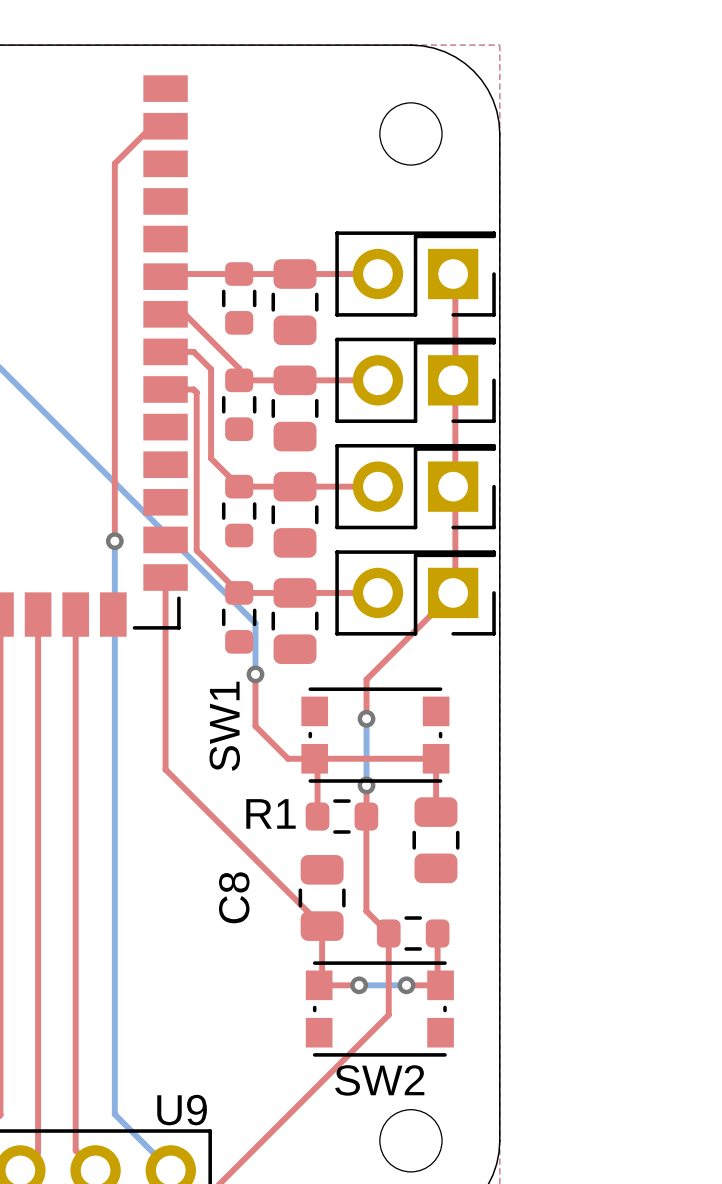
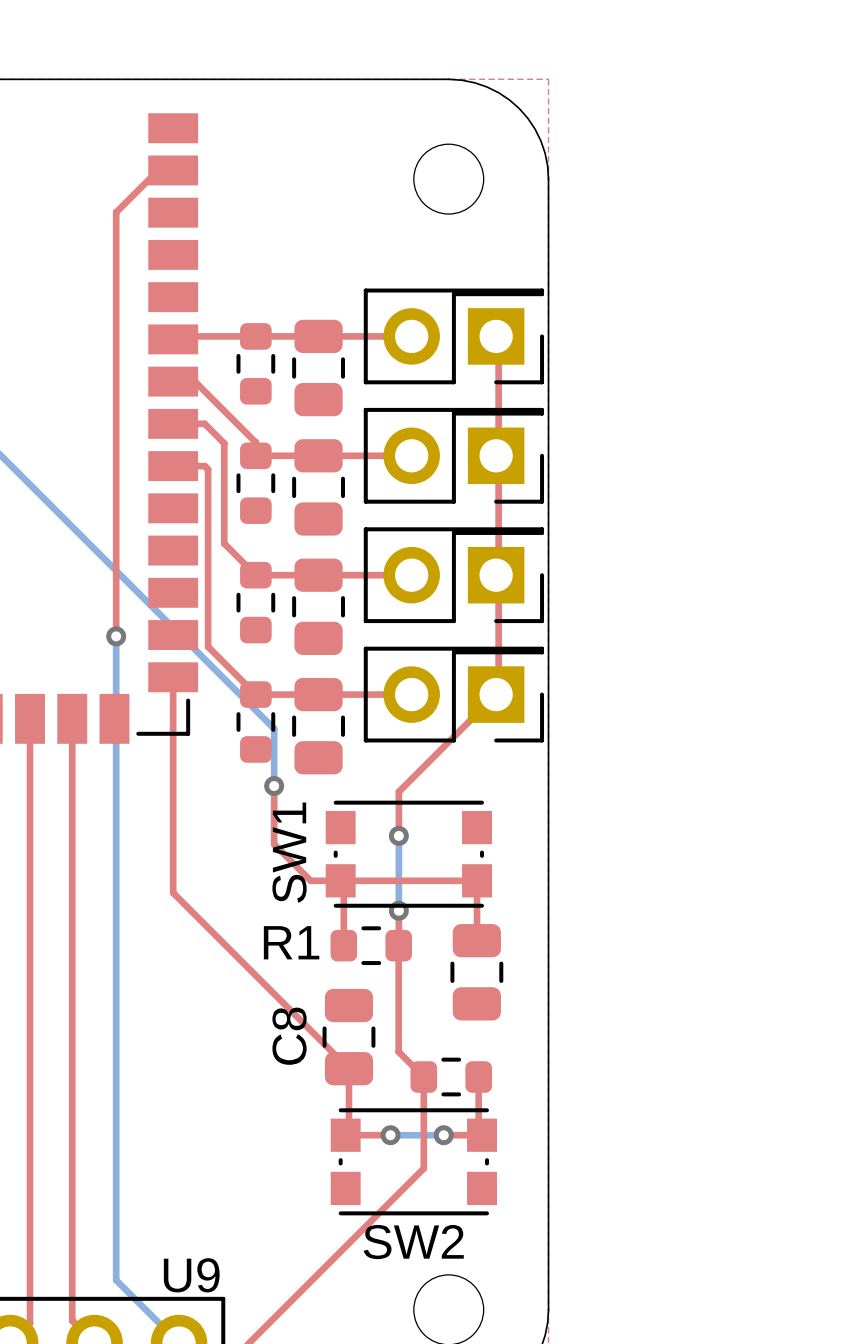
SW1 name position: SW1 (224, 726) -> SW1 (289, 852)
C8 name position: C8 (234, 897) -> C8 (289, 1036)

